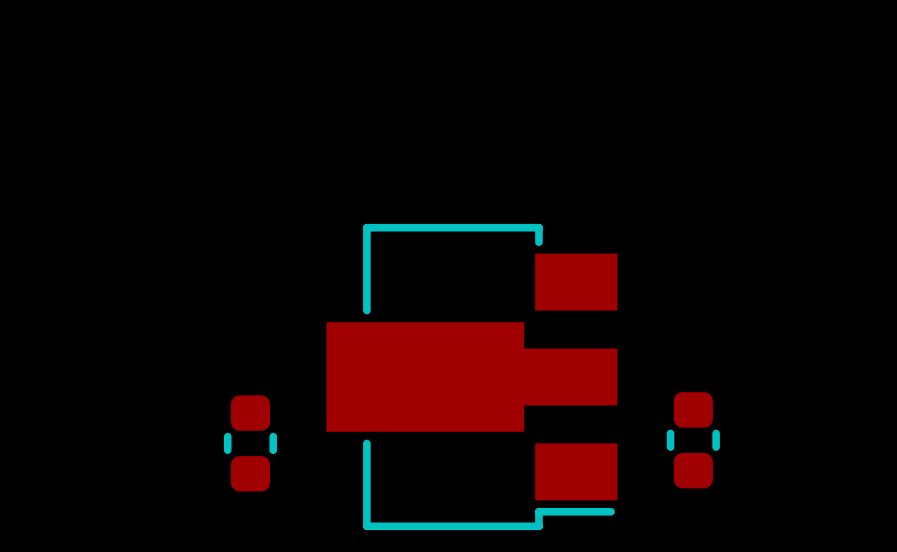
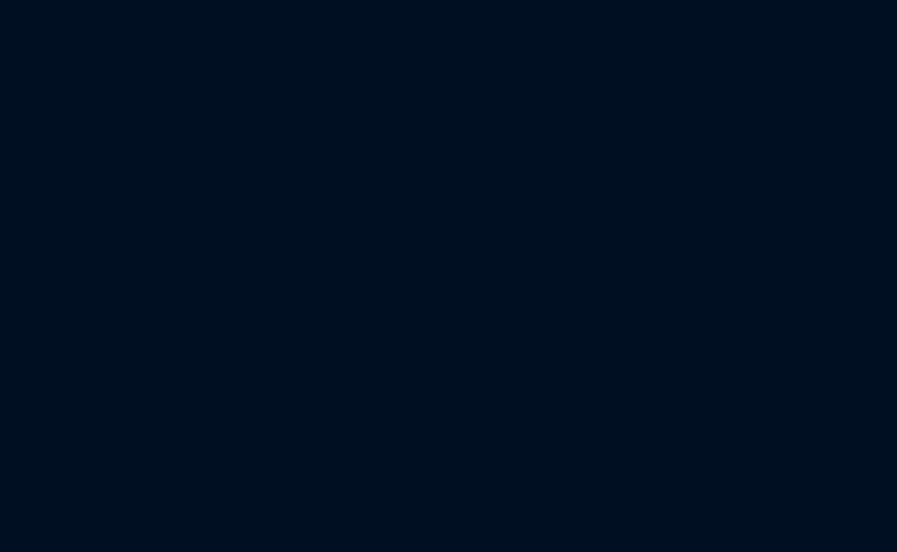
part: (471, 377) -> none
part: (693, 440) -> none
part: (250, 443) -> none

